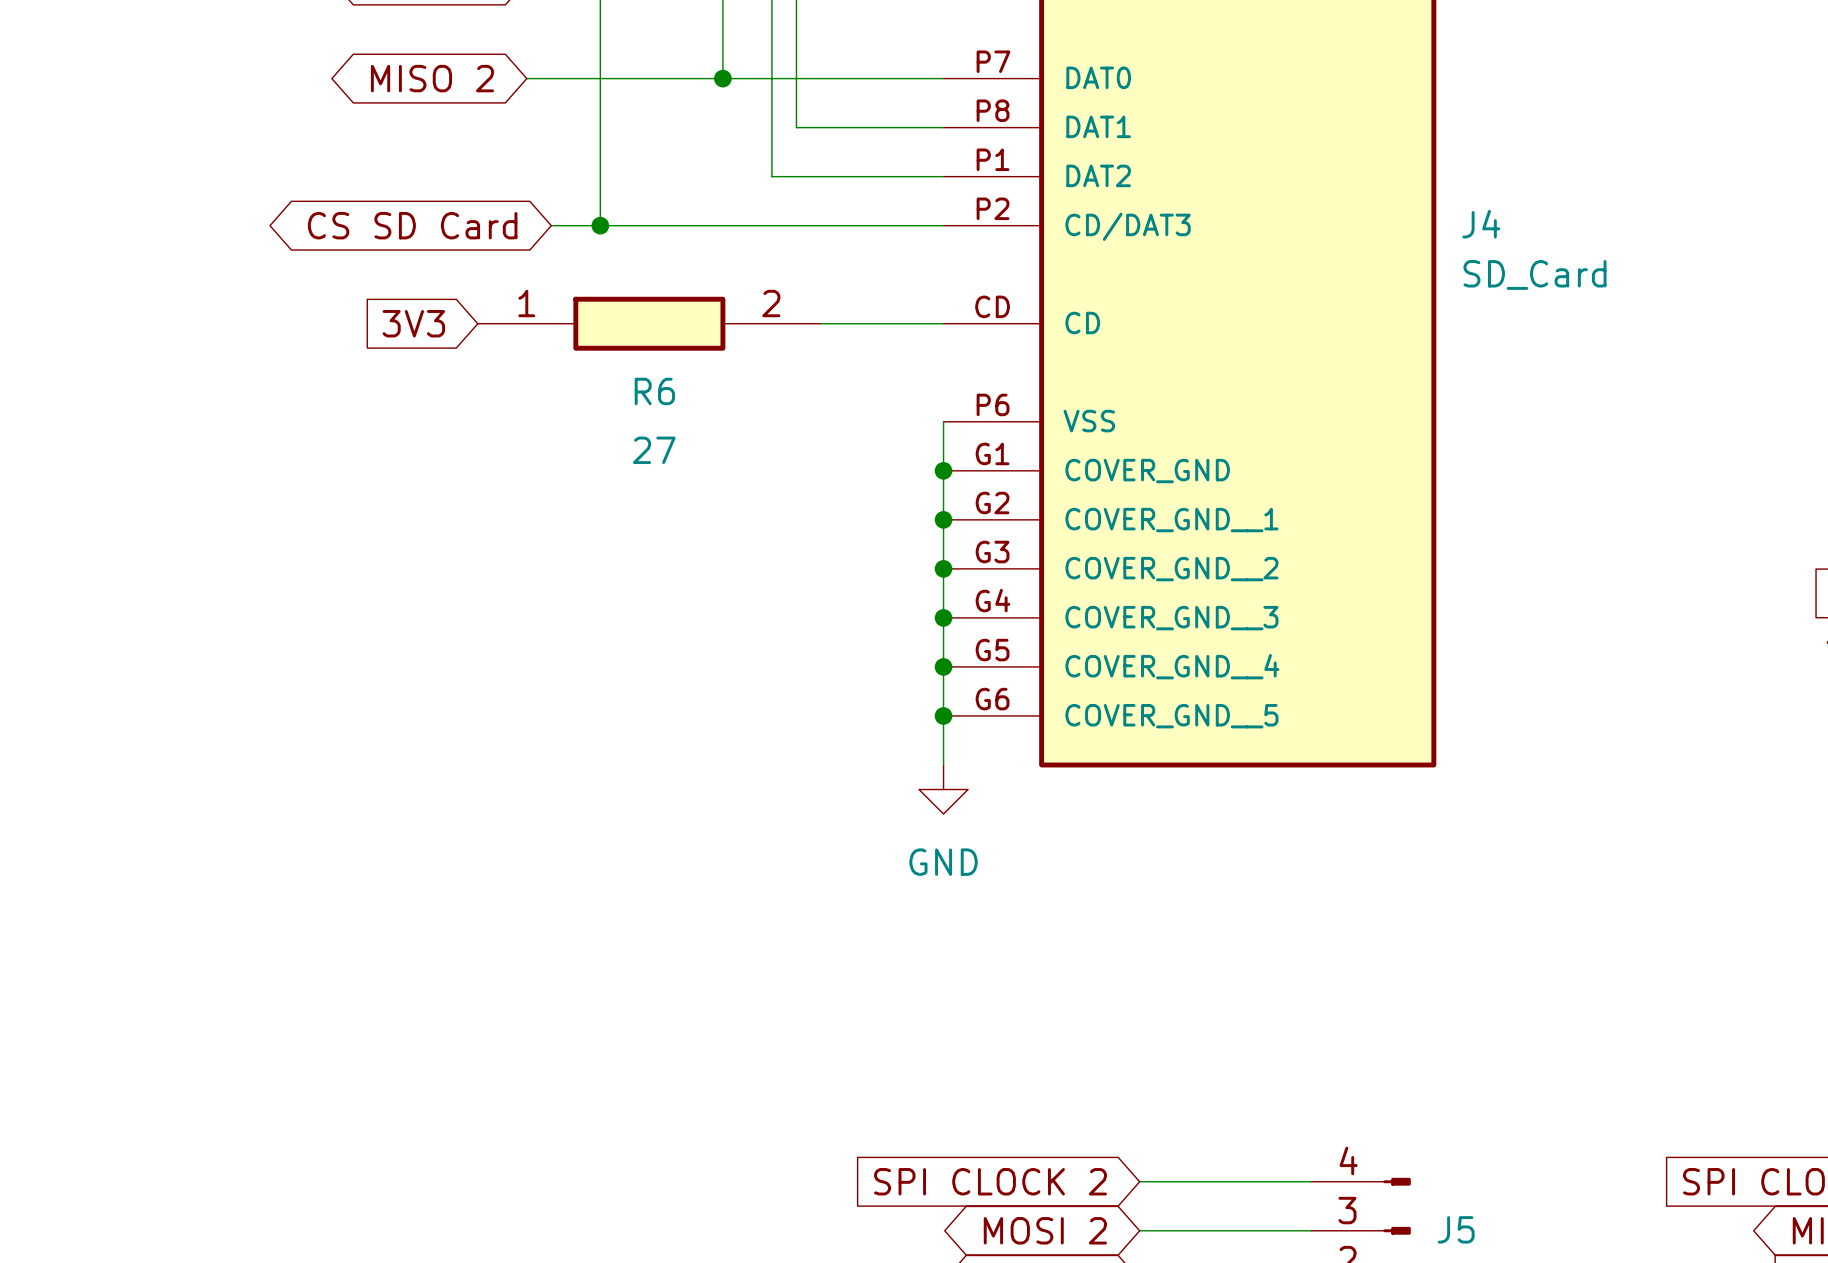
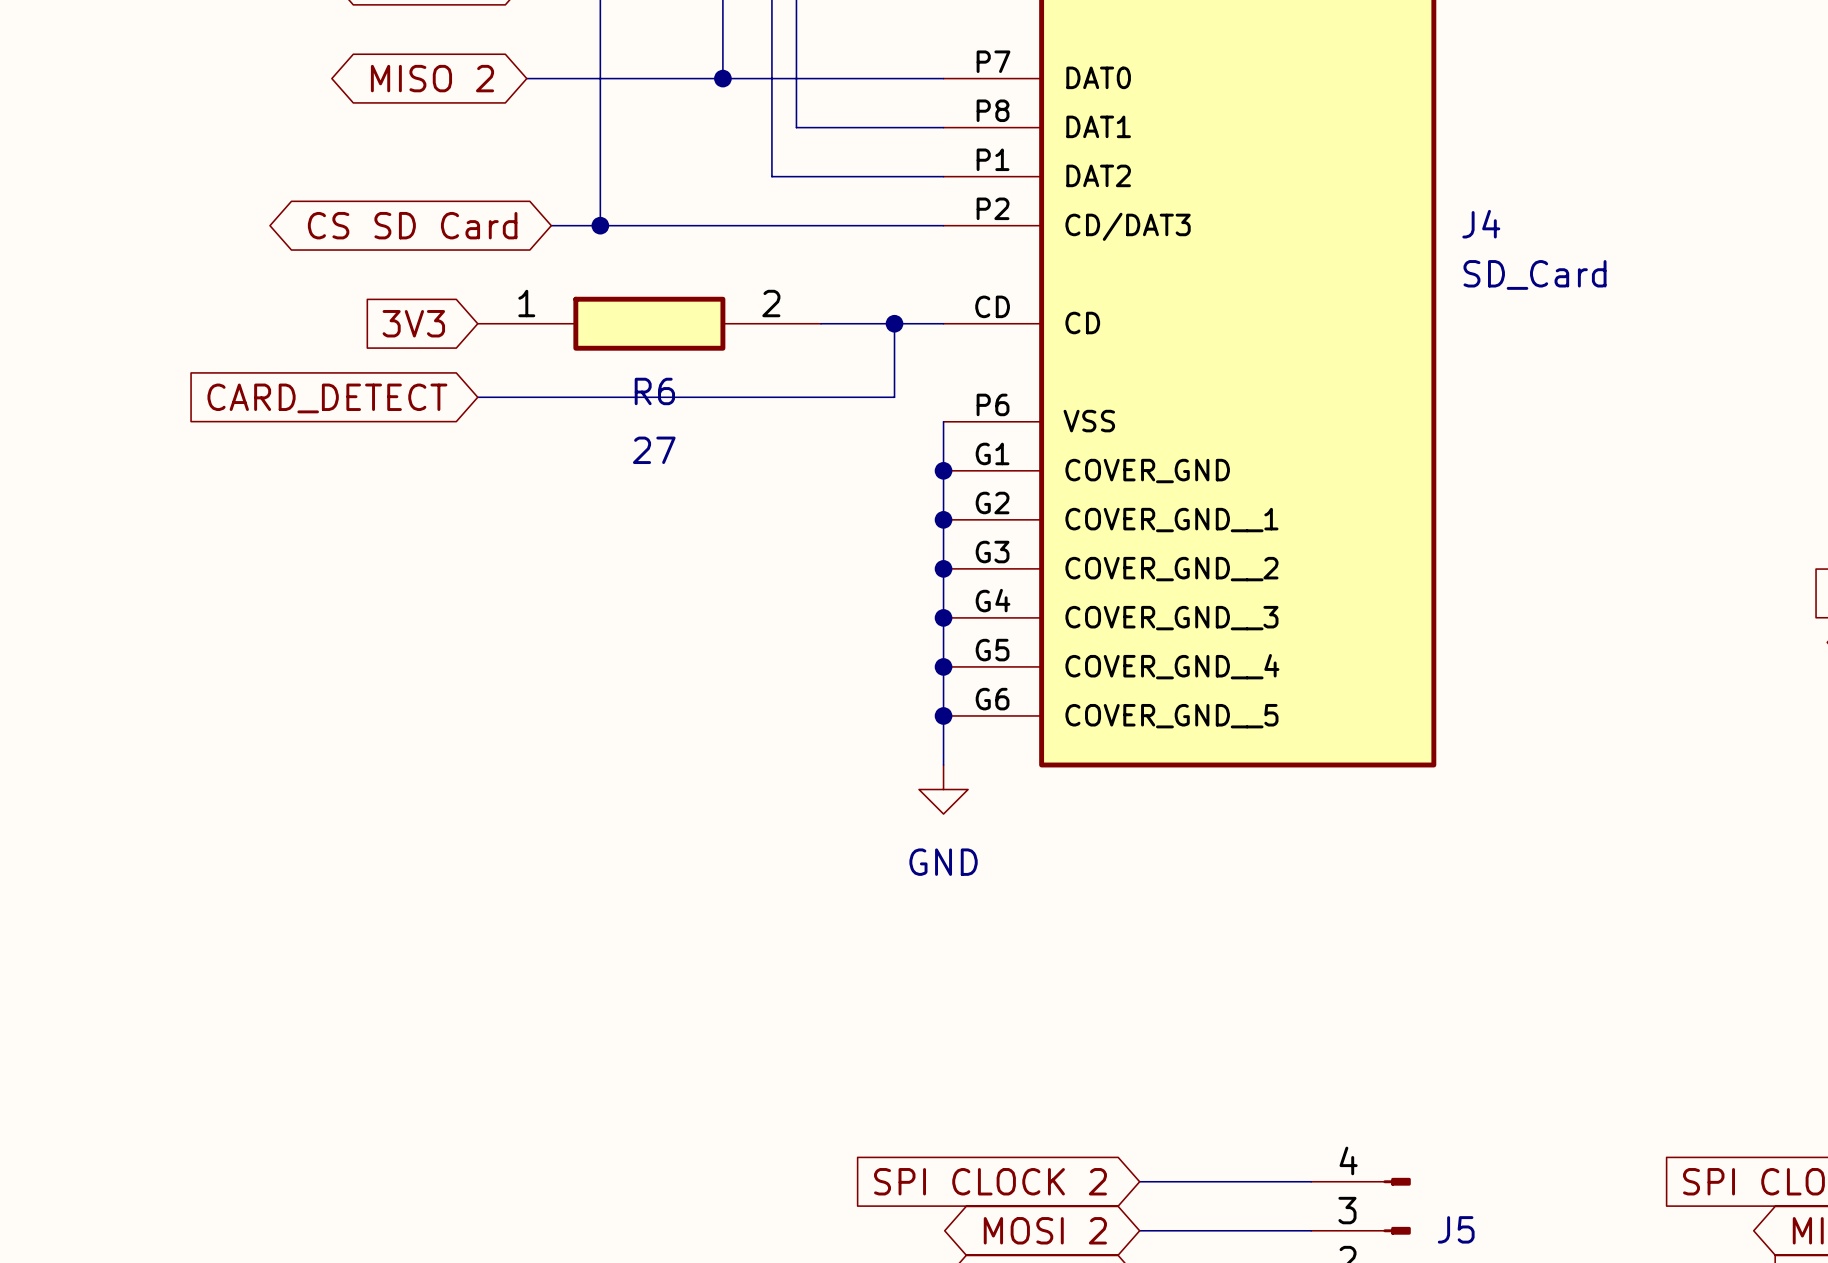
wire: none -> (894, 323) (894, 397) (477, 397)
junction: none -> (894, 323)
global label: none -> CARD_DETECT (327, 398)

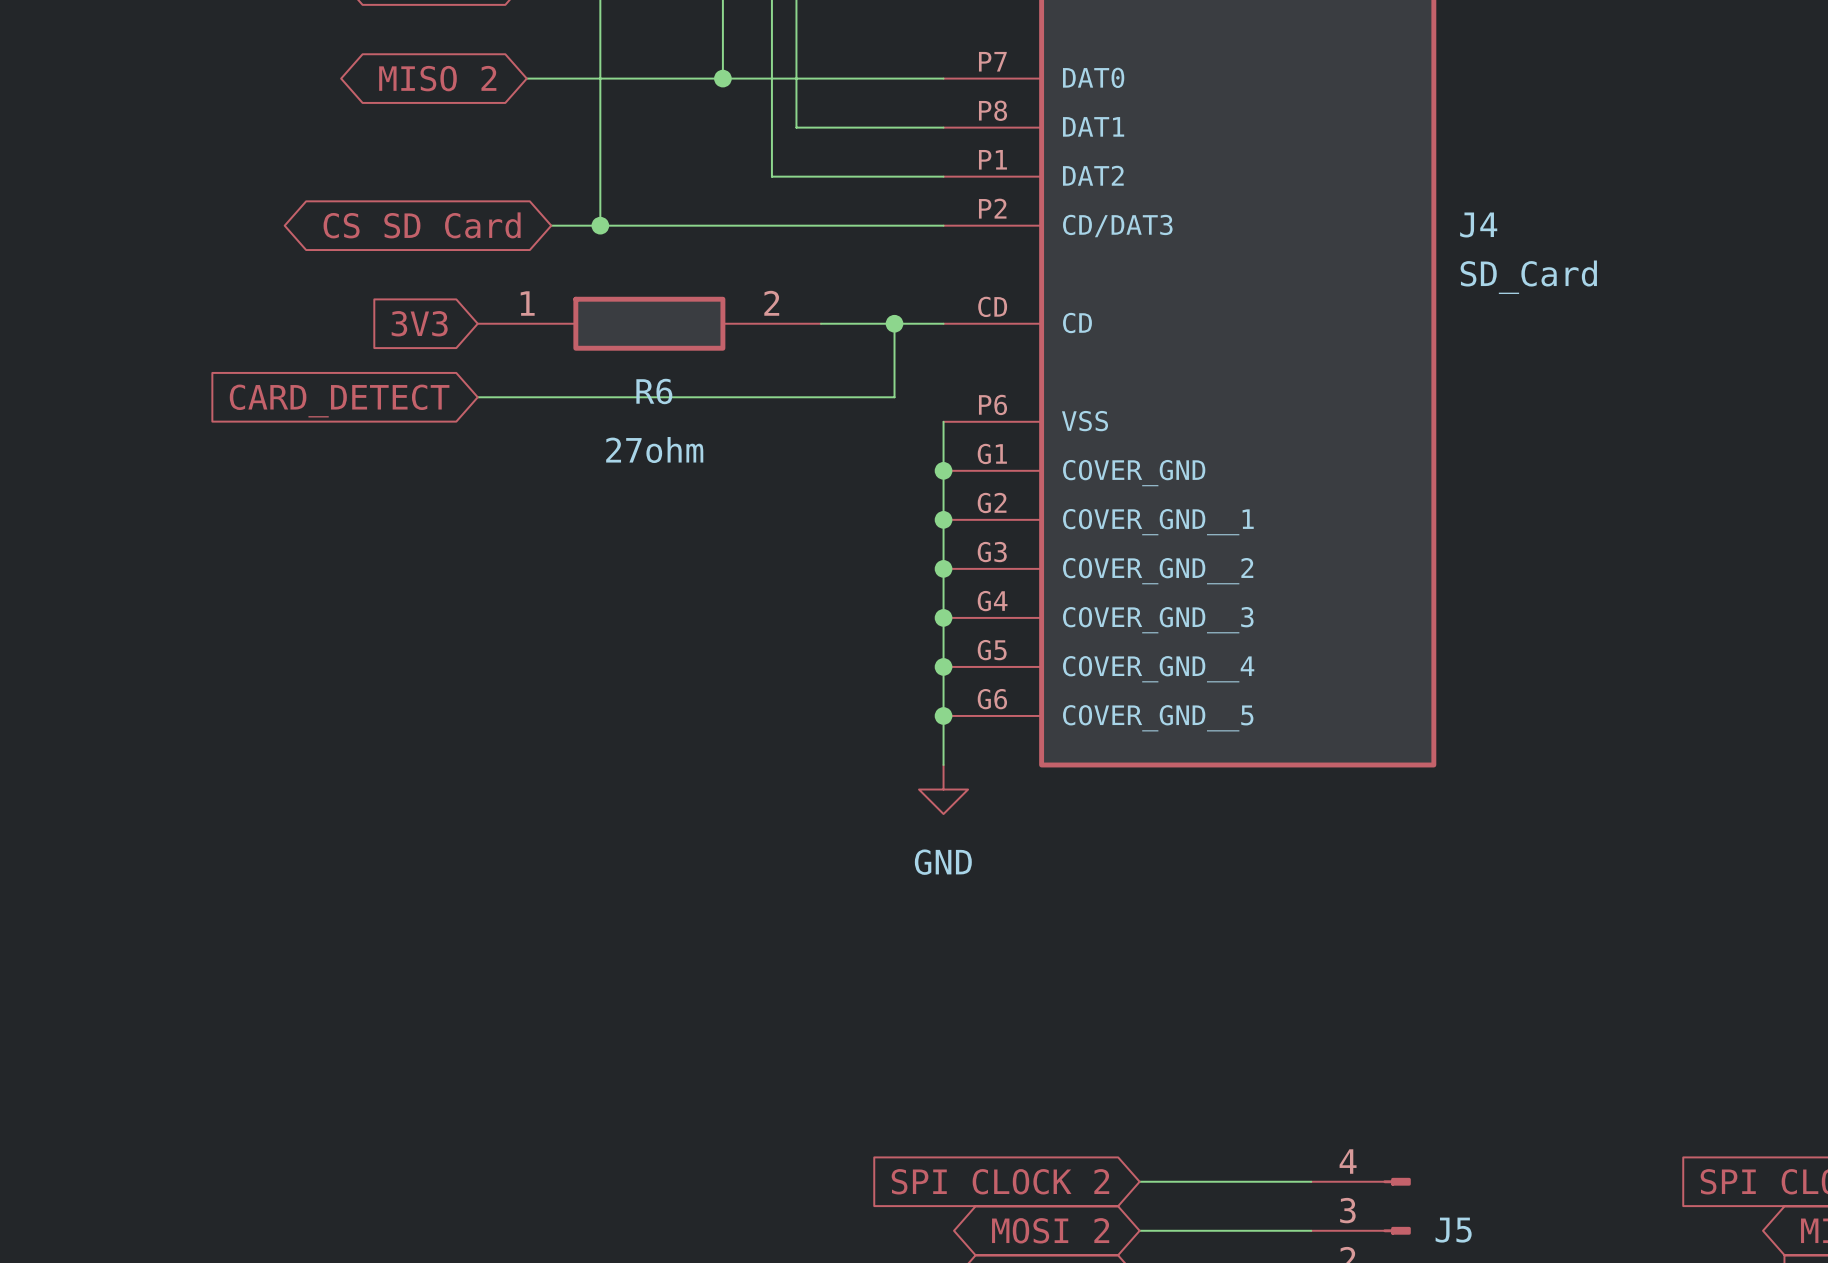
R6 value: 27 (654, 450) -> 27ohm (654, 450)

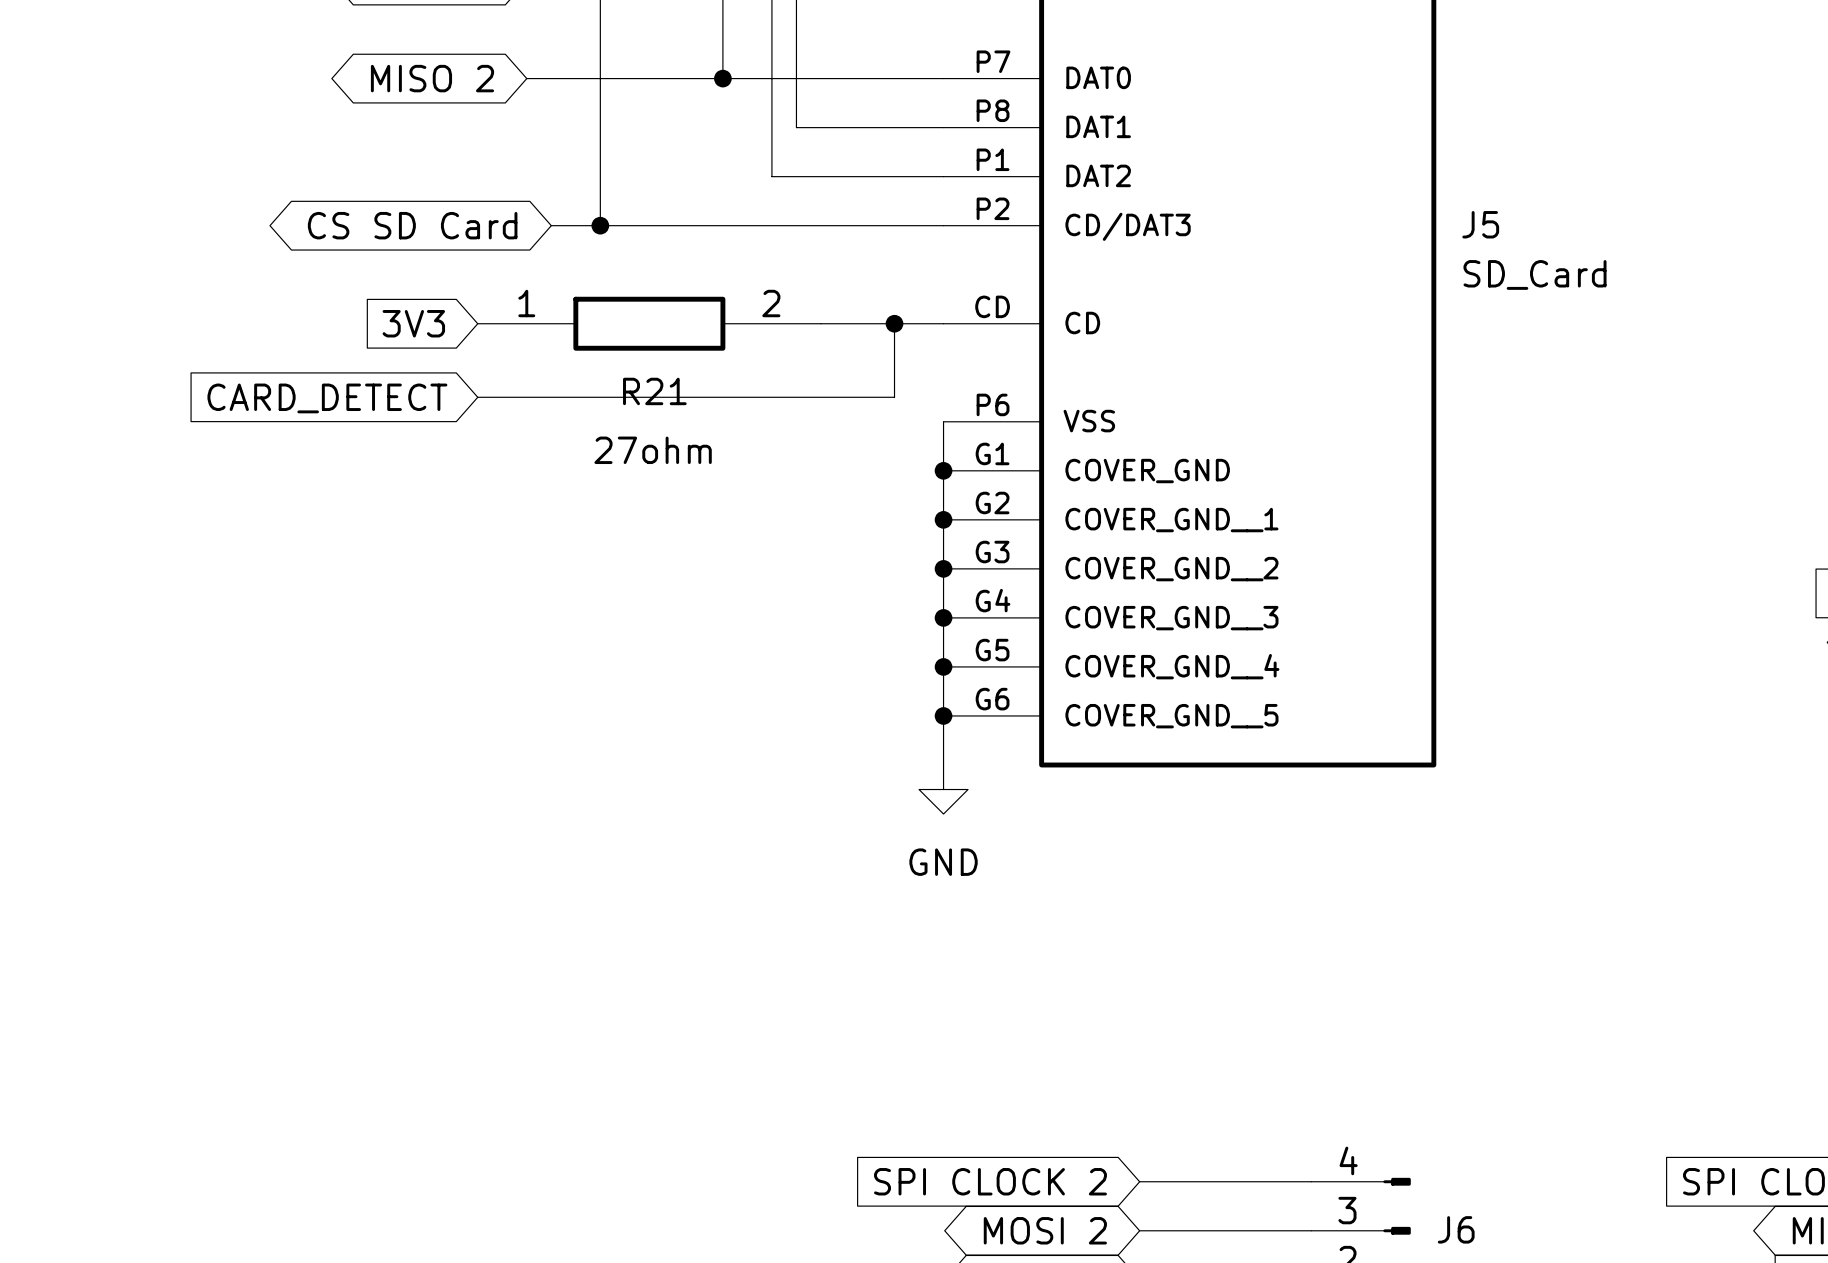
J4 name: J4 (1478, 225) -> J5 (1480, 224)
R6 name: R6 (654, 391) -> R21 (654, 391)
J5 name: J5 (1453, 1230) -> J6 (1456, 1229)

